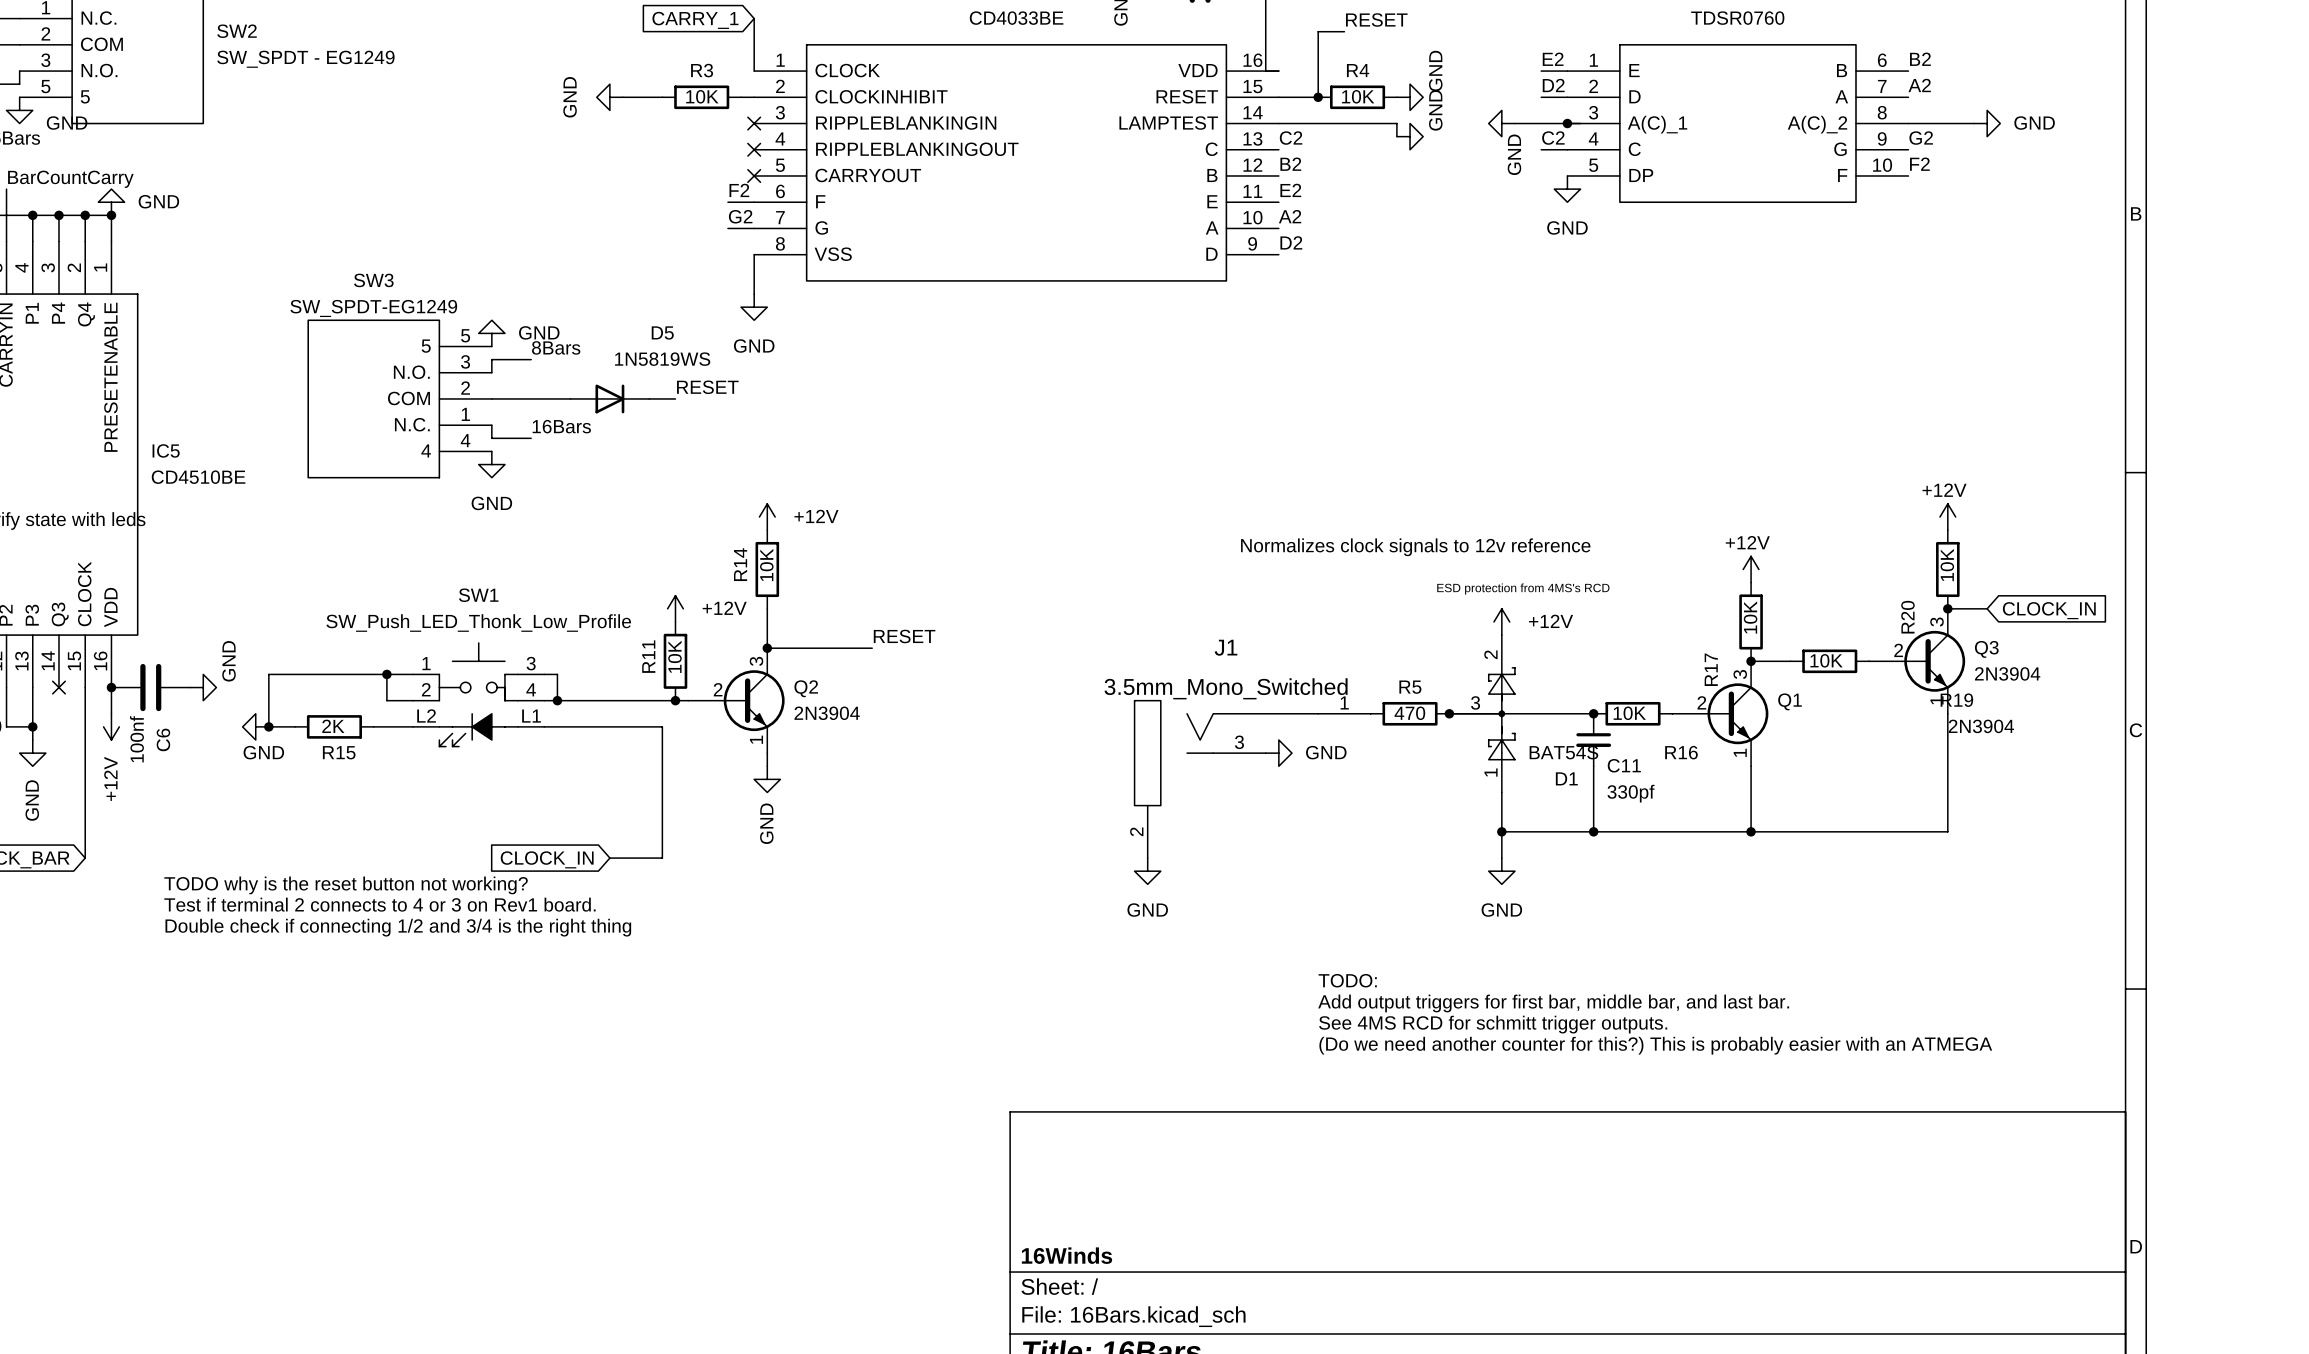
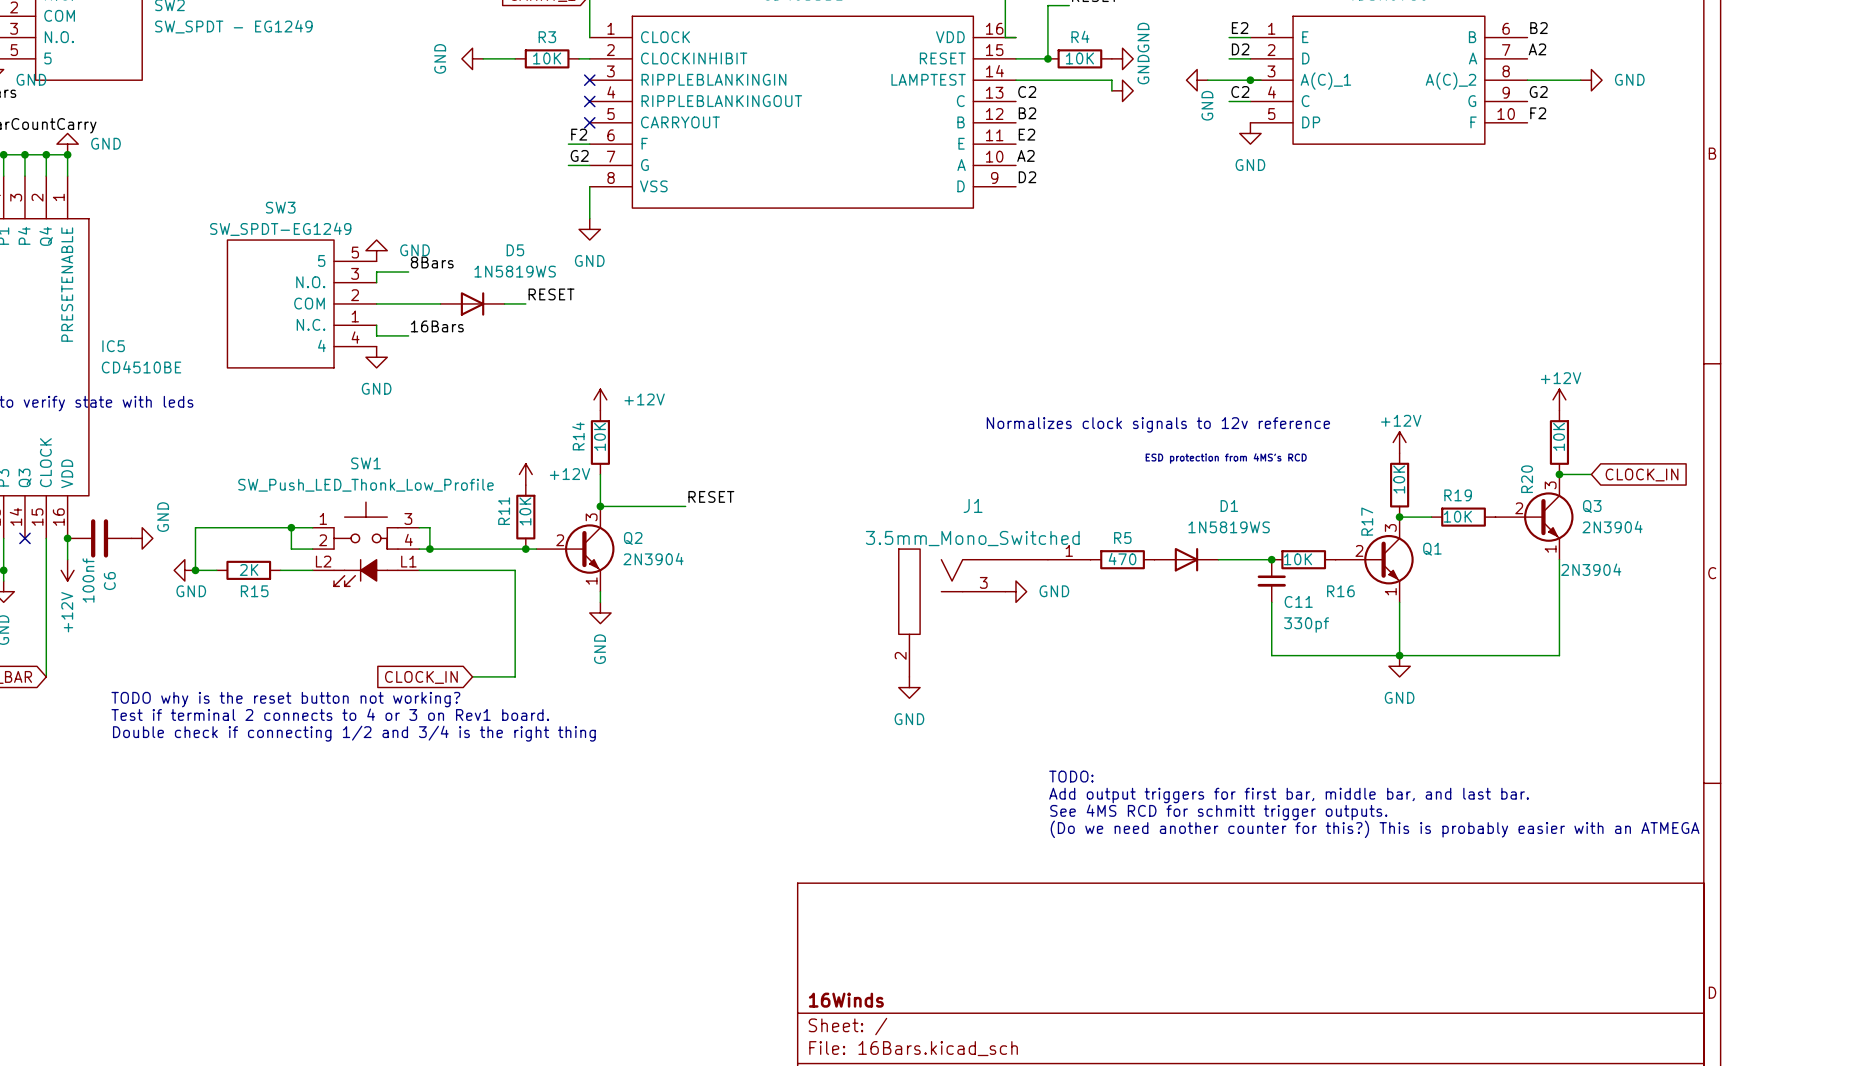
power symbol: +12V (1501, 621) -> none
D1 symbol: [1449, 635, 1515, 793] -> [1154, 547, 1219, 572]
R19 name position: R19 (1956, 700) -> R19 (1458, 495)
junction: (1449, 713) -> none
D1 value: BAT54S (1563, 752) -> 1N5819WS (1229, 527)
D1 name position: D1 (1566, 778) -> D1 (1229, 506)
wire: (1501, 792) (1501, 858) -> none
wire: (1501, 831) (1593, 831) -> none
junction: (1501, 831) -> none
junction: (1593, 831) -> none
power symbol position: GND (1501, 871) -> GND (1399, 666)

